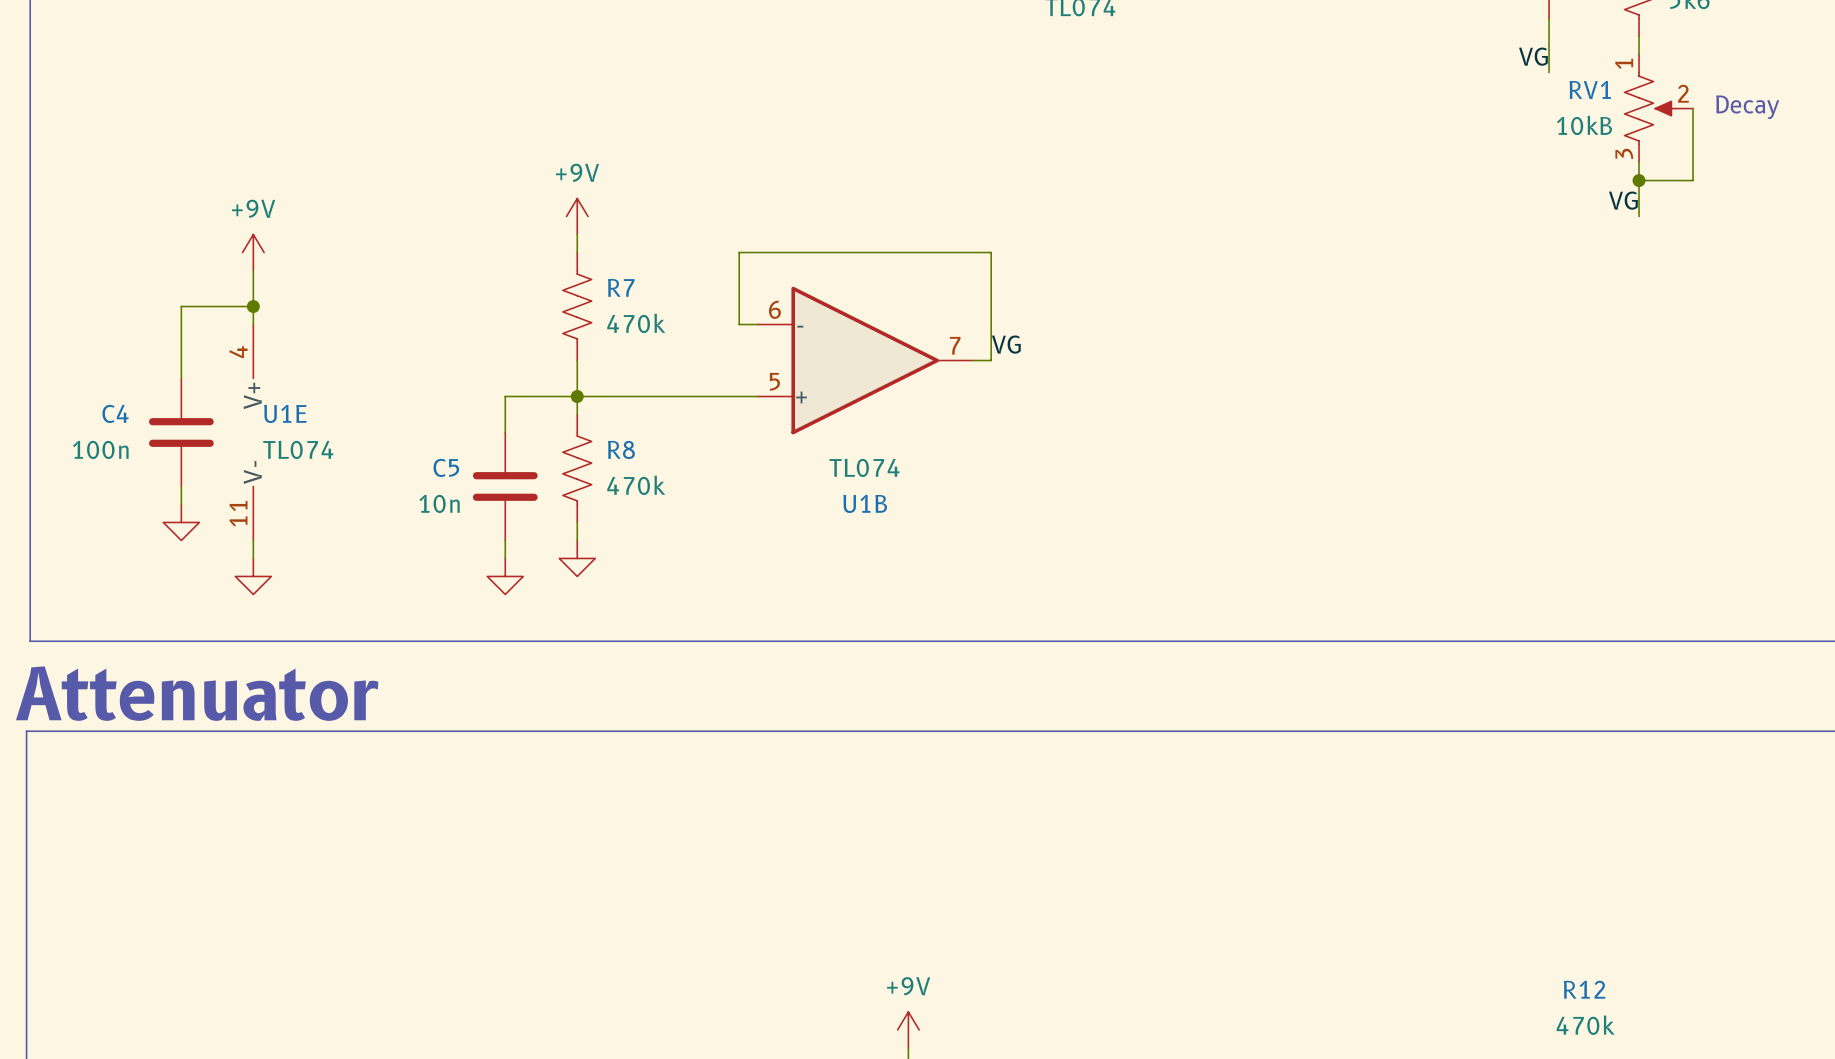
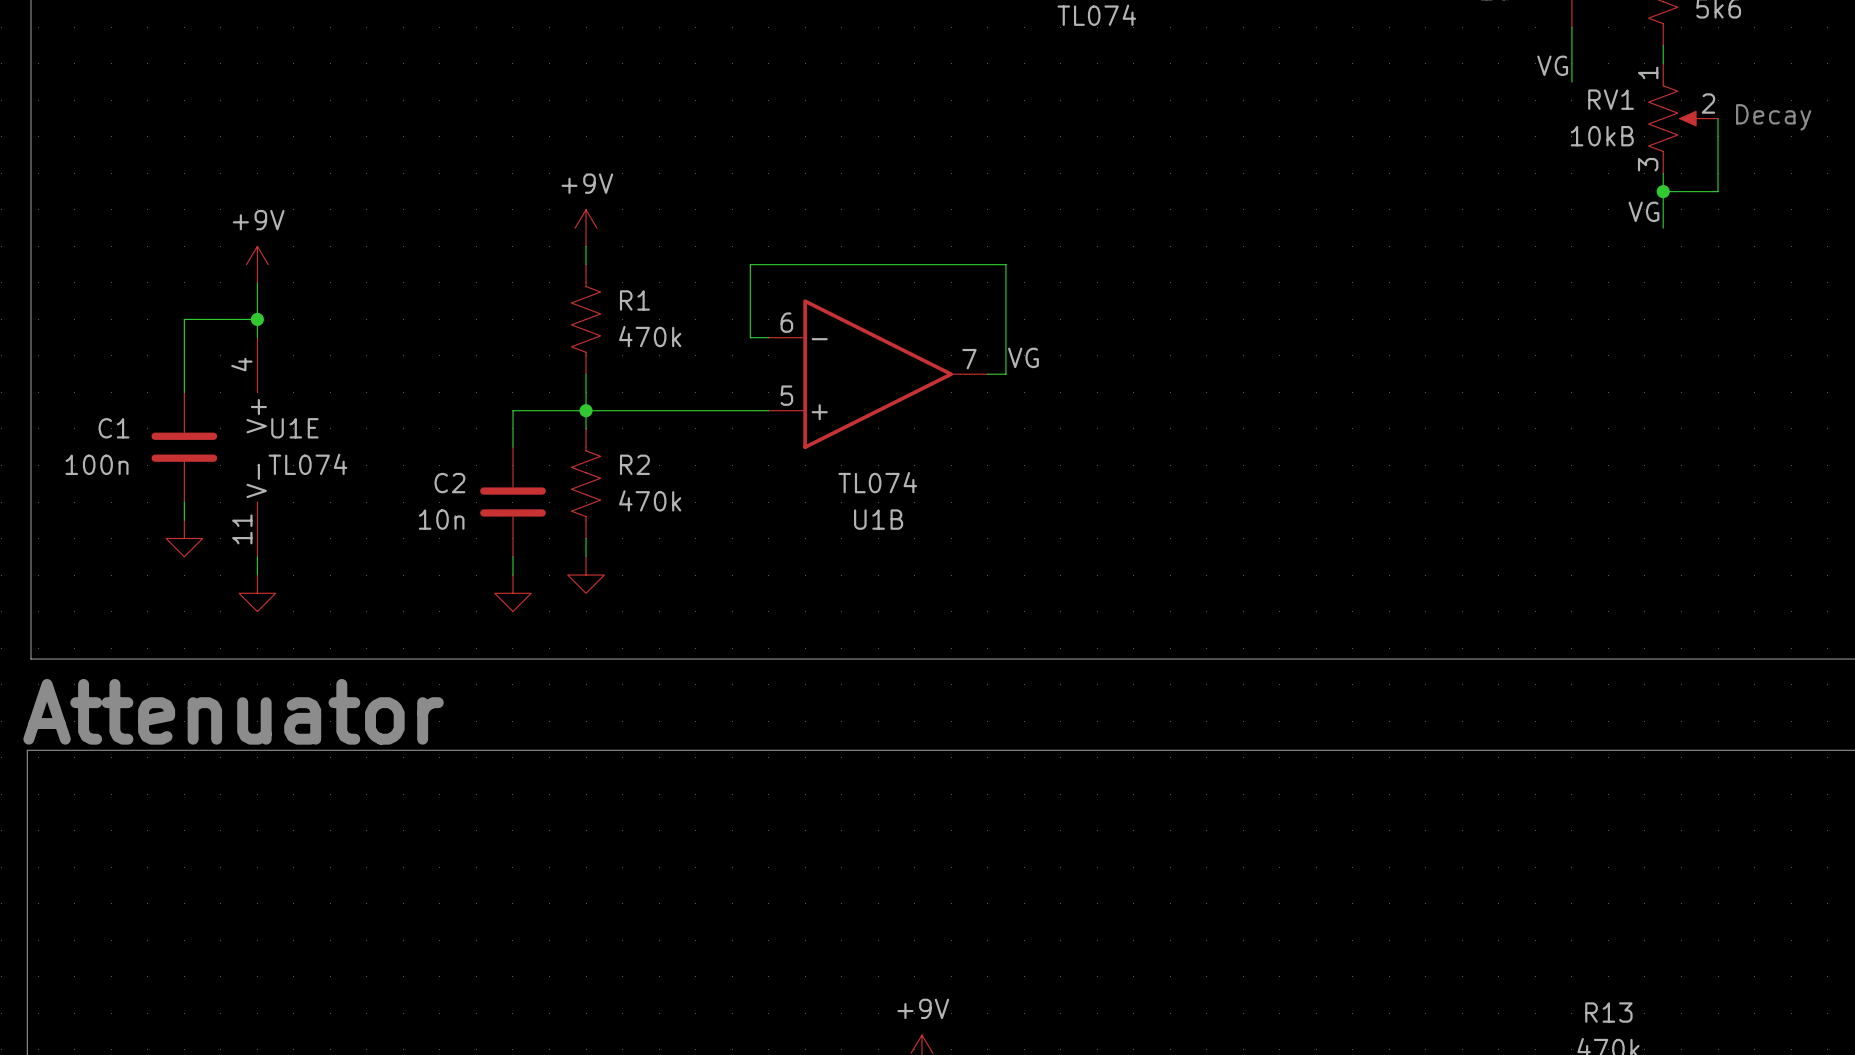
R7 name: R7 (621, 287) -> R1 (634, 300)
C4 name: C4 (115, 413) -> C1 (113, 428)
R8 name: R8 (621, 449) -> R2 (634, 464)
C5 name: C5 (446, 467) -> C2 (449, 483)
R12 name: R12 (1584, 989) -> R13 (1608, 1012)

